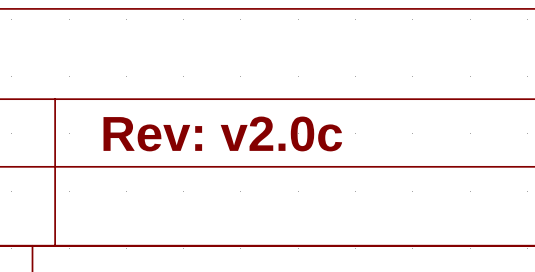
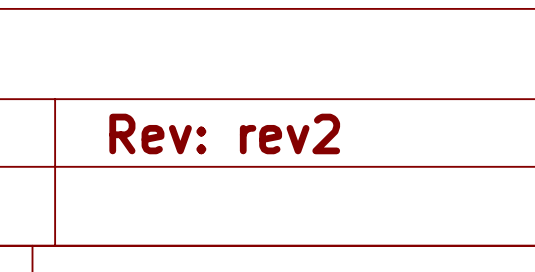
title block: Rev: v2.0c (222, 133) -> Rev: rev2 (224, 133)

